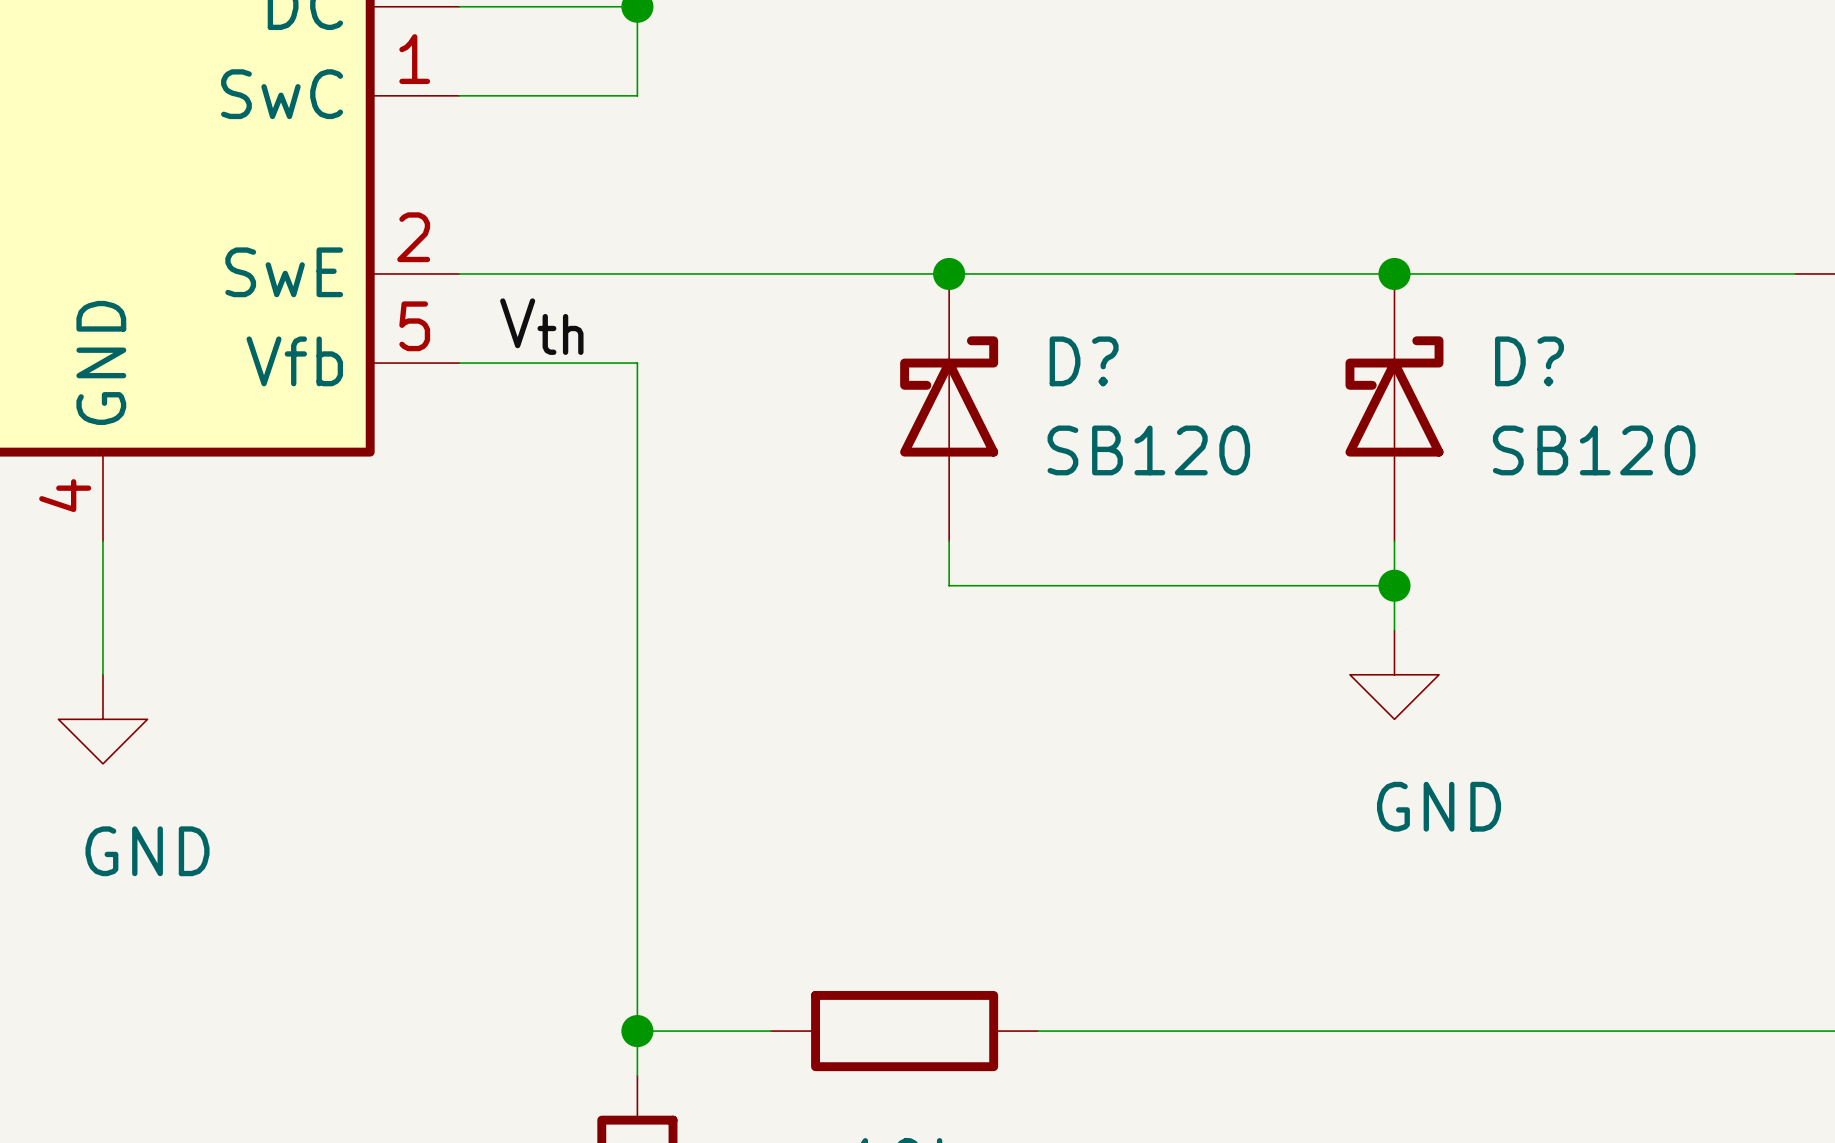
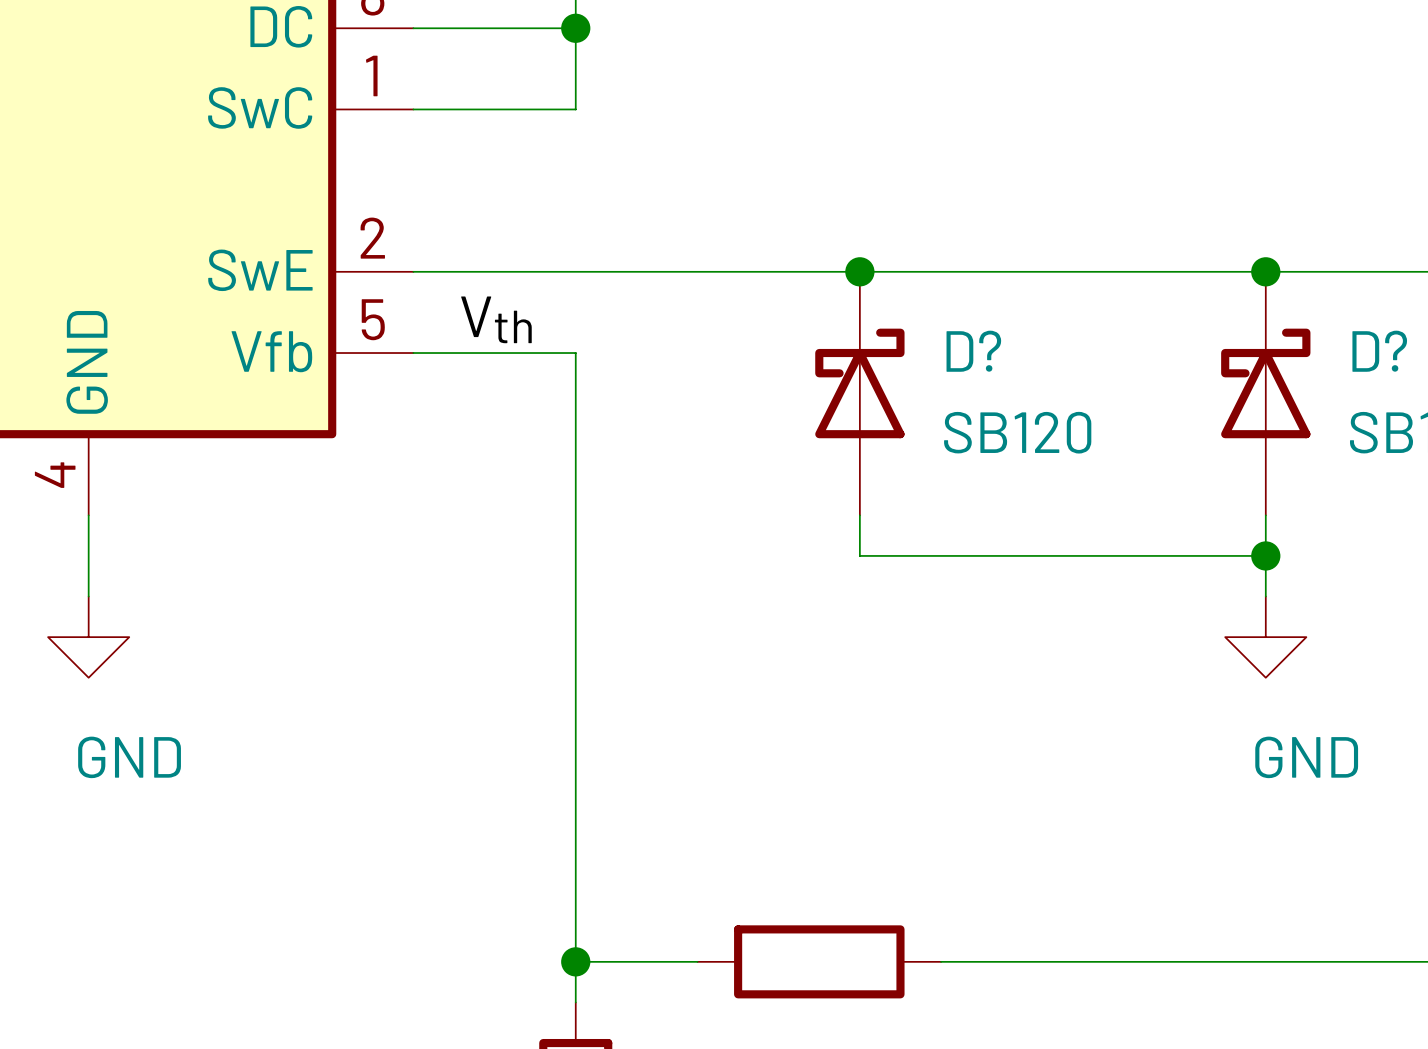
power symbol position: GND (102, 719) -> GND (88, 637)

